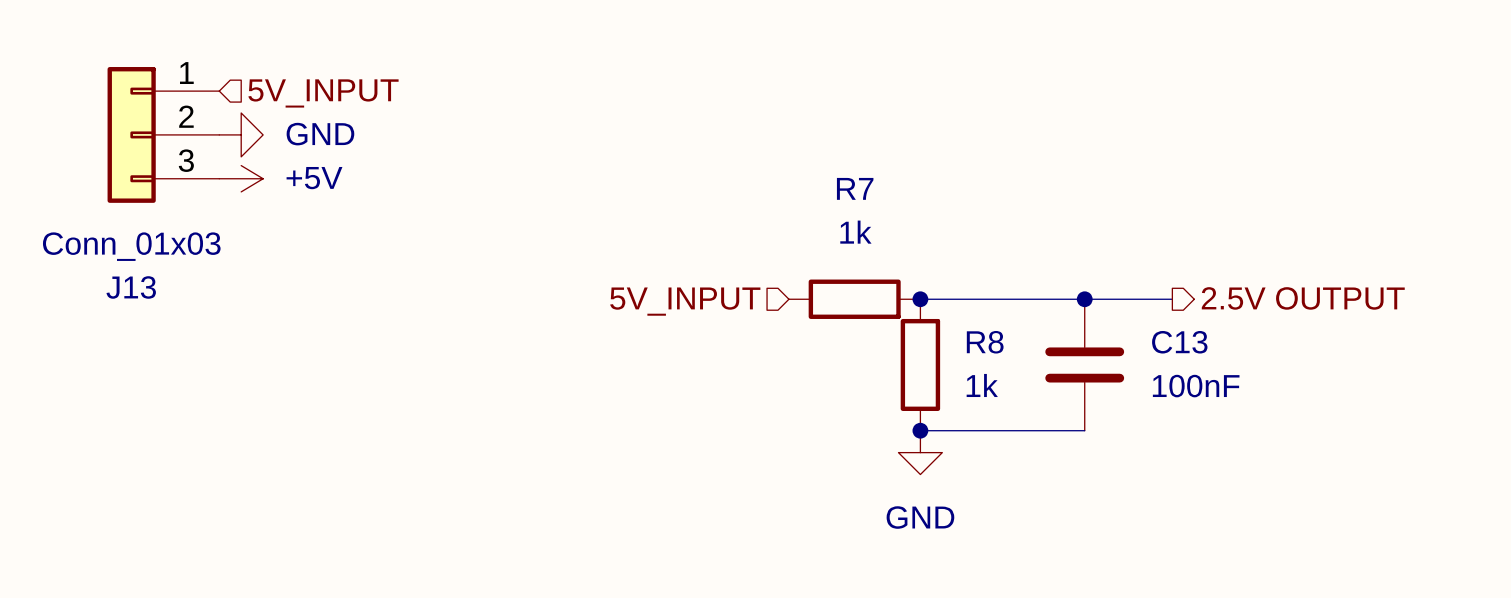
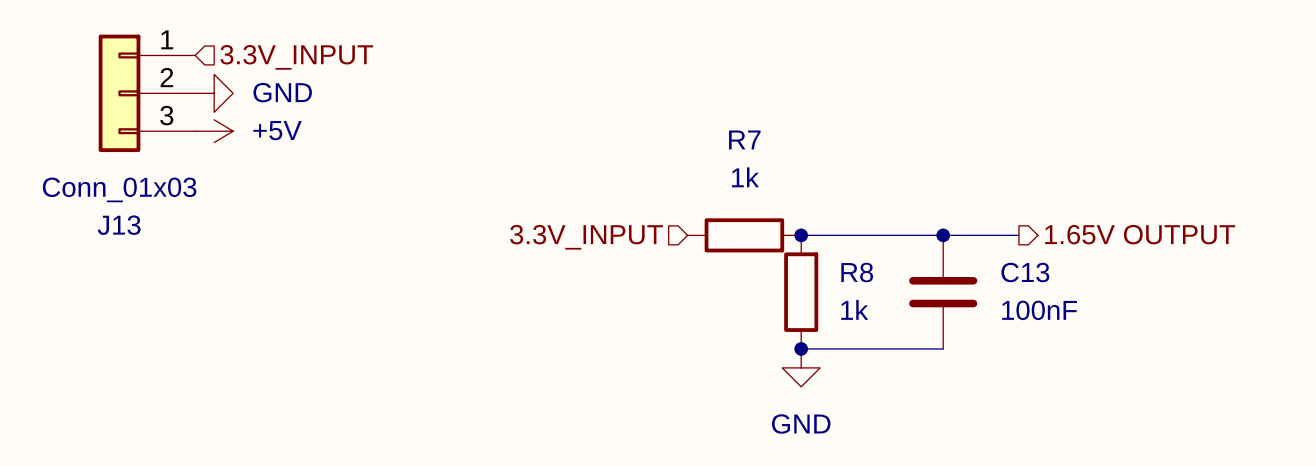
hierarchical label: 5V_INPUT (323, 93) -> 3.3V_INPUT (296, 57)
hierarchical label: 2.5V OUTPUT (1303, 298) -> 1.65V OUTPUT (1140, 234)
hierarchical label: 5V_INPUT (685, 301) -> 3.3V_INPUT (586, 237)

